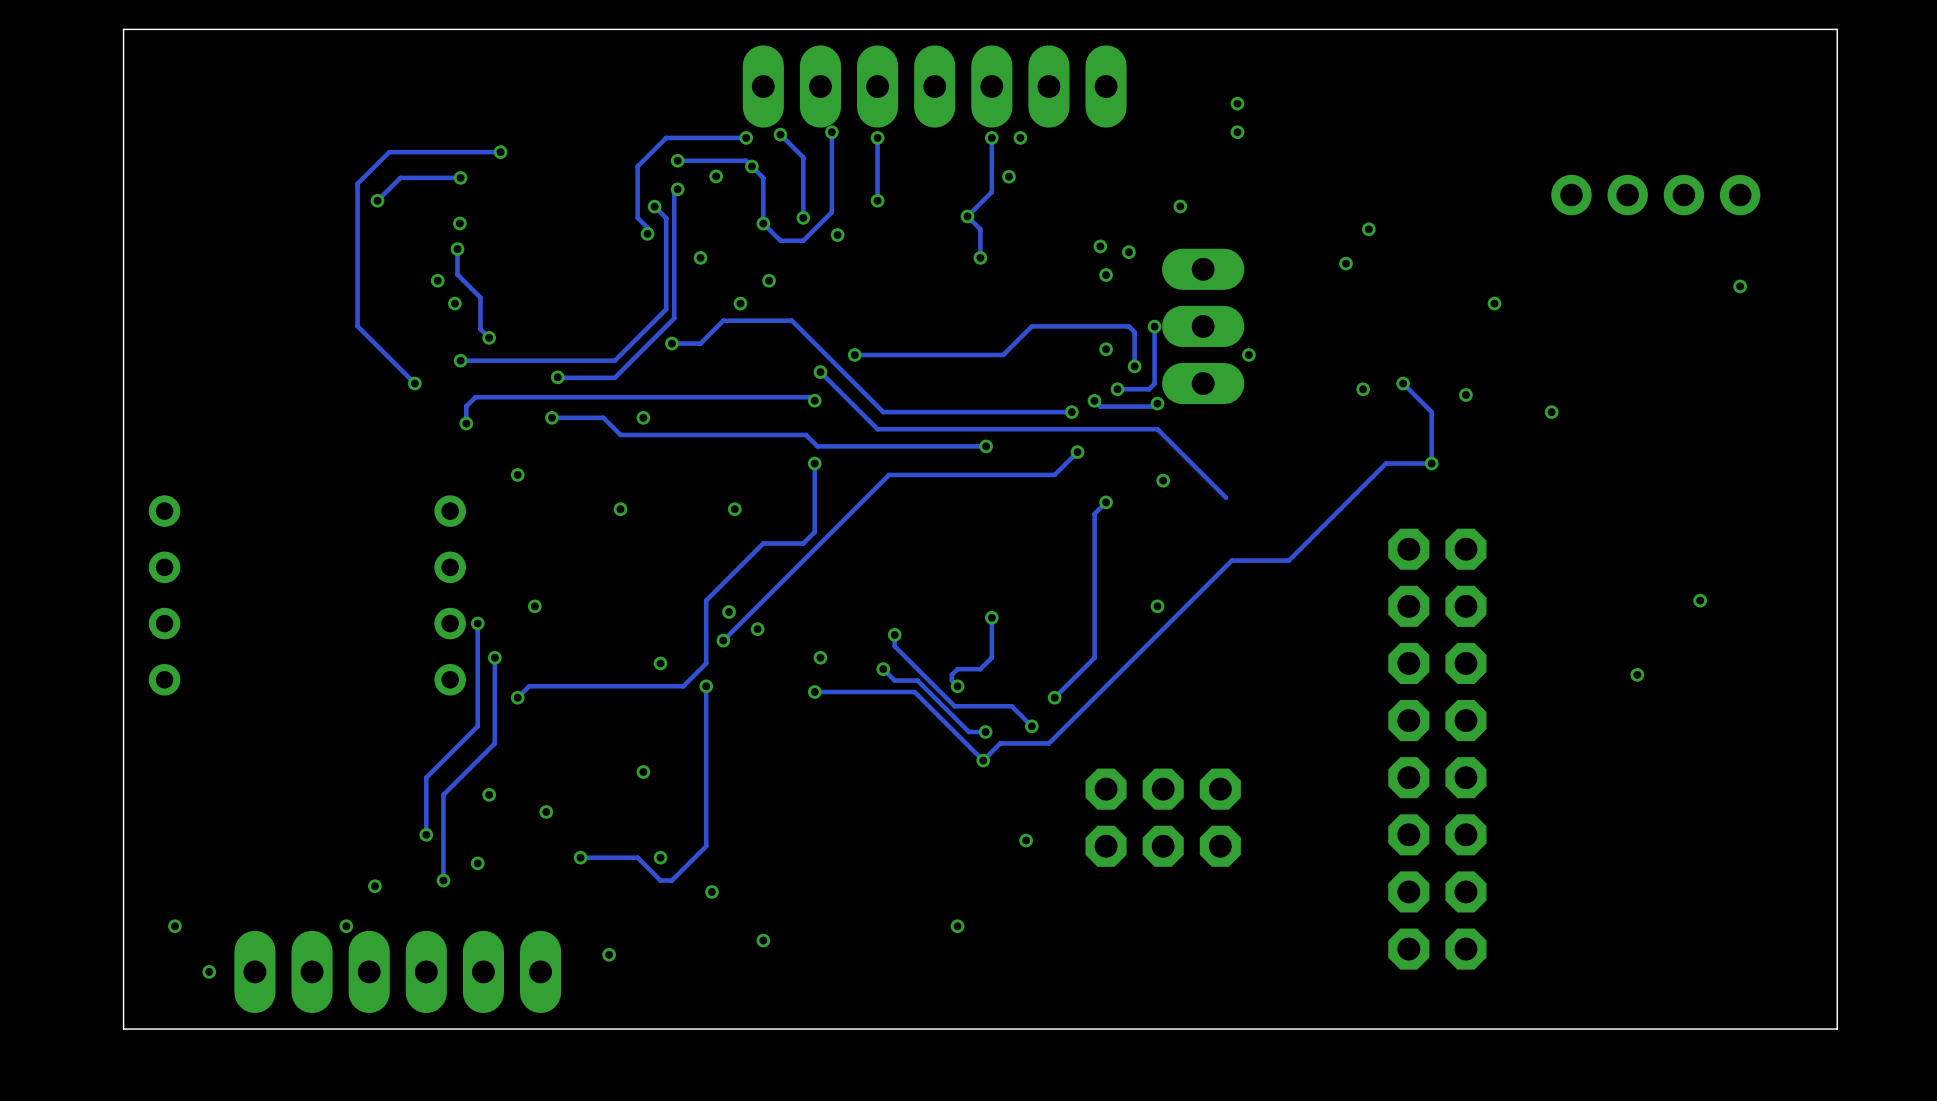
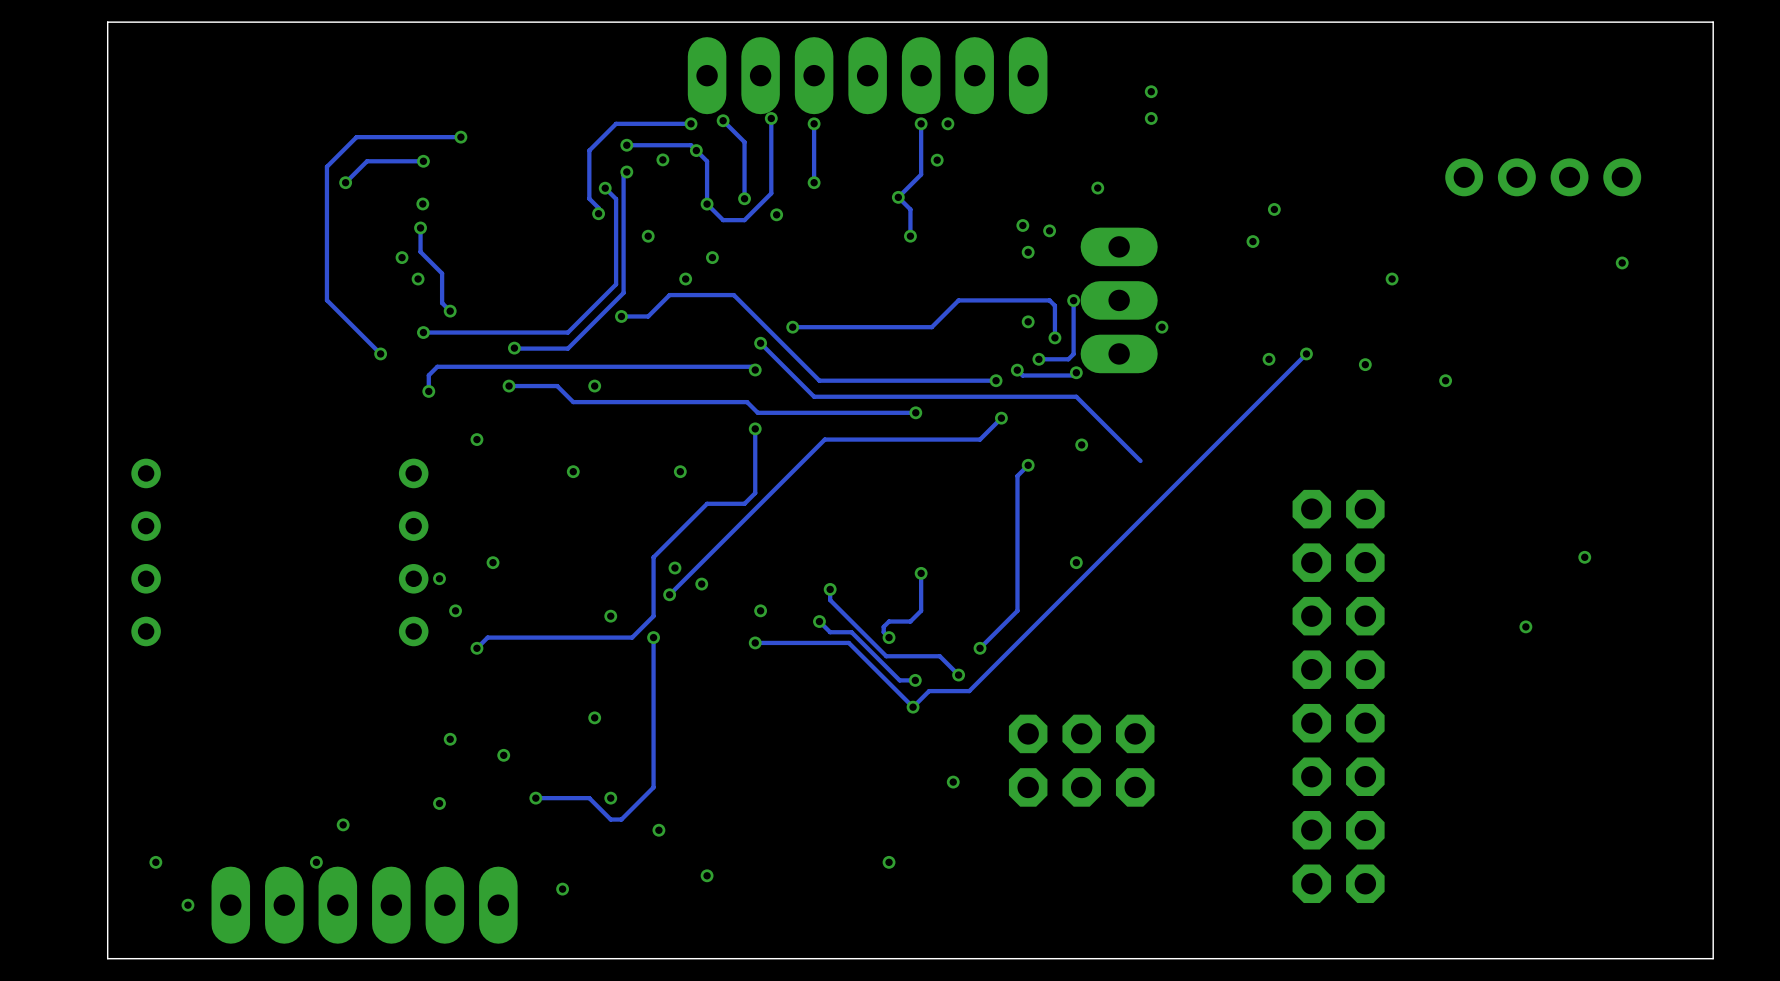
track: (1403, 383) (1431, 412) (1431, 463) (1385, 463) (1288, 560) (1231, 560) (1048, 743) (1043, 743) -> (1306, 353) (969, 691)
via: (1431, 463) -> none
track: (477, 623) (477, 726) (426, 777) (426, 834) -> none
track: (494, 657) (494, 743) (443, 794) (443, 880) -> none
via: (426, 834) -> none
via: (443, 880) -> none

